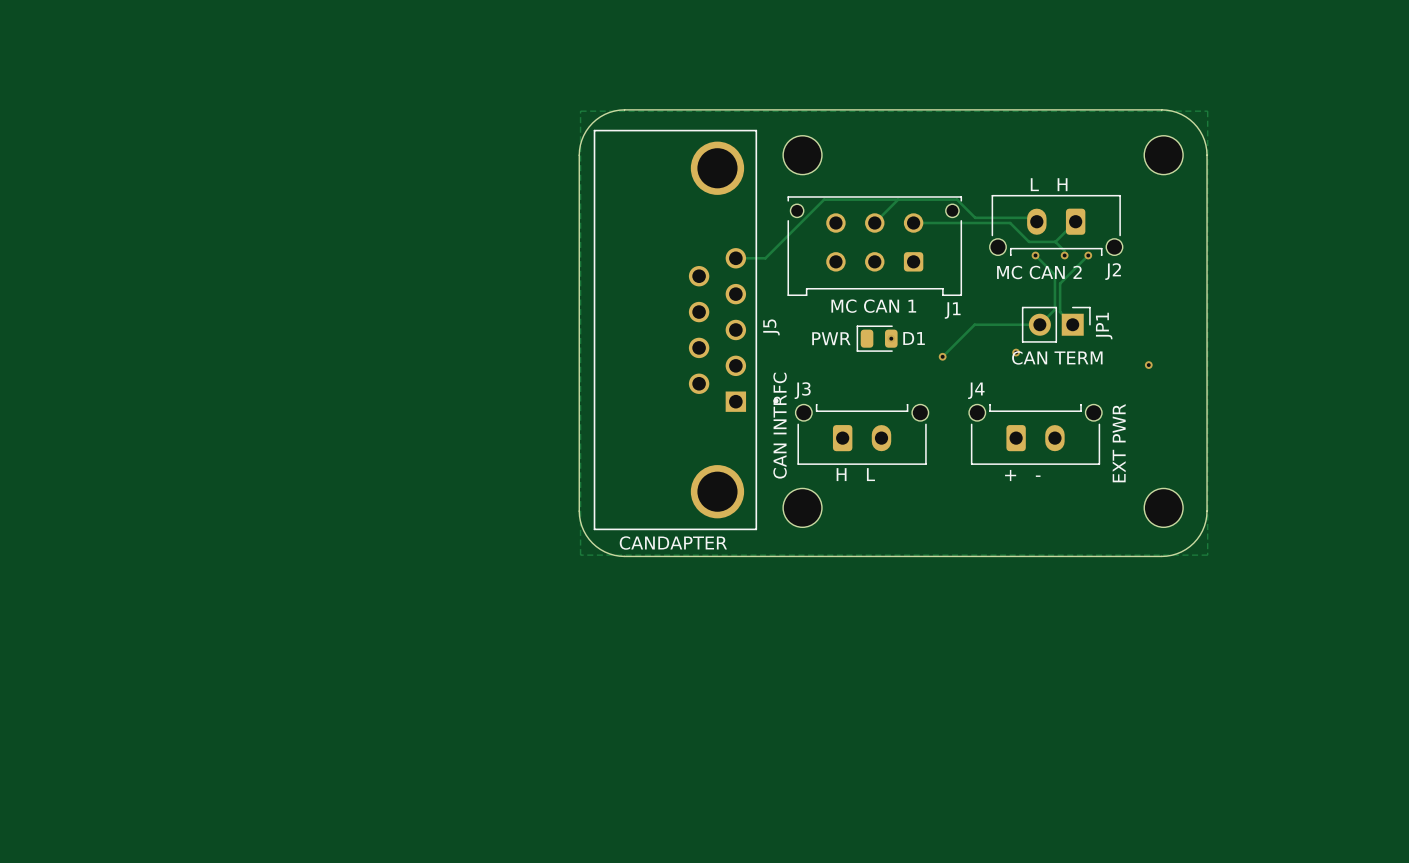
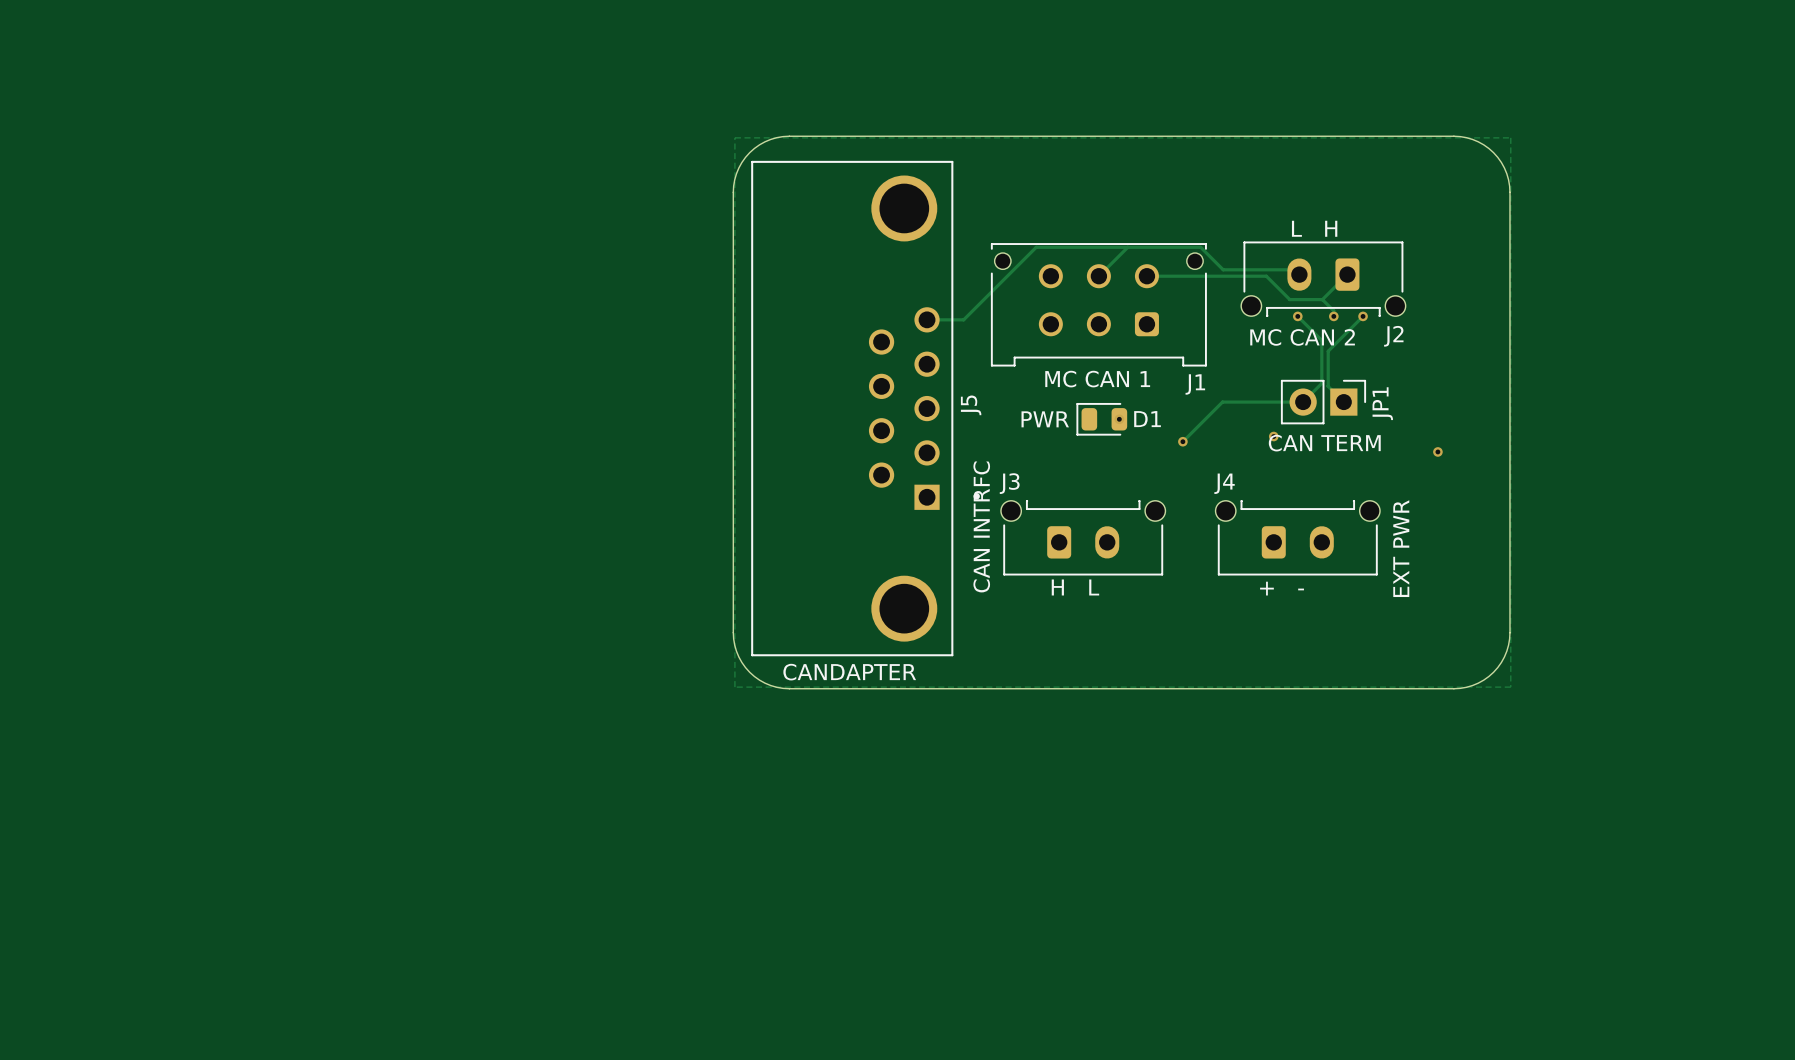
part: (802, 155) -> none
part: (1163, 155) -> none
part: (802, 507) -> none
part: (1163, 507) -> none

